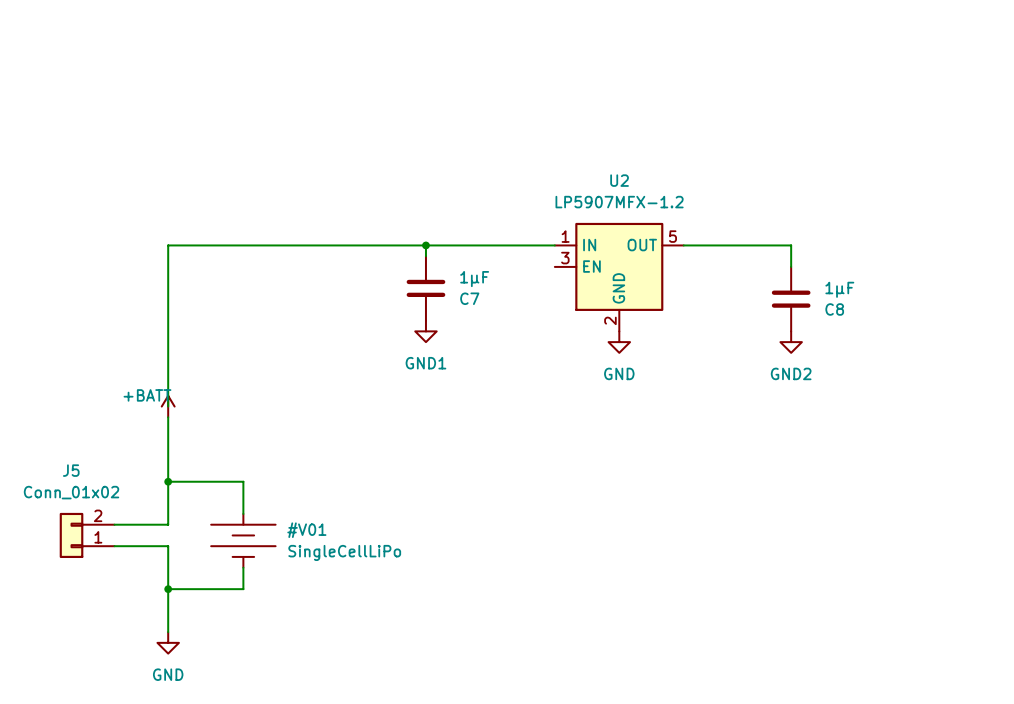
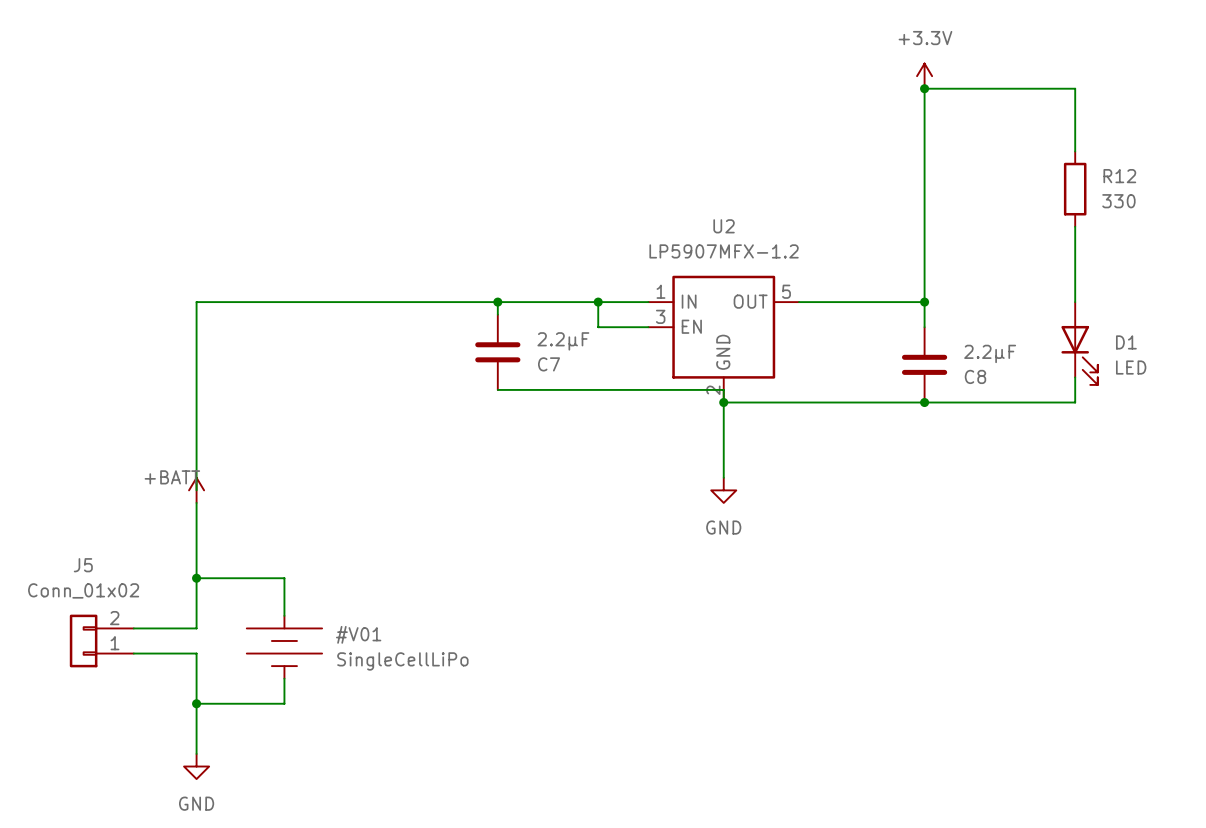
power symbol: none -> +3.3V (924, 76)
junction: none -> (924, 88)
wire: none -> (1075, 151) (1075, 88) (924, 88) (924, 302)
R12: none -> 330 (1075, 189)
wire: none -> (1075, 226) (1075, 302)
wire: none -> (598, 302) (598, 327) (648, 327)
junction: none -> (598, 302)
junction: none -> (924, 302)
C7 value: 1µF (474, 279) -> 2.2µF (563, 341)
D1: none -> LED (1079, 343)
C8 value: 1µF (839, 289) -> 2.2µF (990, 353)
wire: none -> (1075, 377) (1075, 402) (723, 402)
wire: none -> (497, 389) (723, 389) (723, 477)
power symbol: GND1 (425, 331) -> none
junction: none -> (723, 402)
junction: none -> (924, 402)
power symbol position: GND (619, 342) -> GND (723, 490)
power symbol: GND2 (791, 342) -> none

